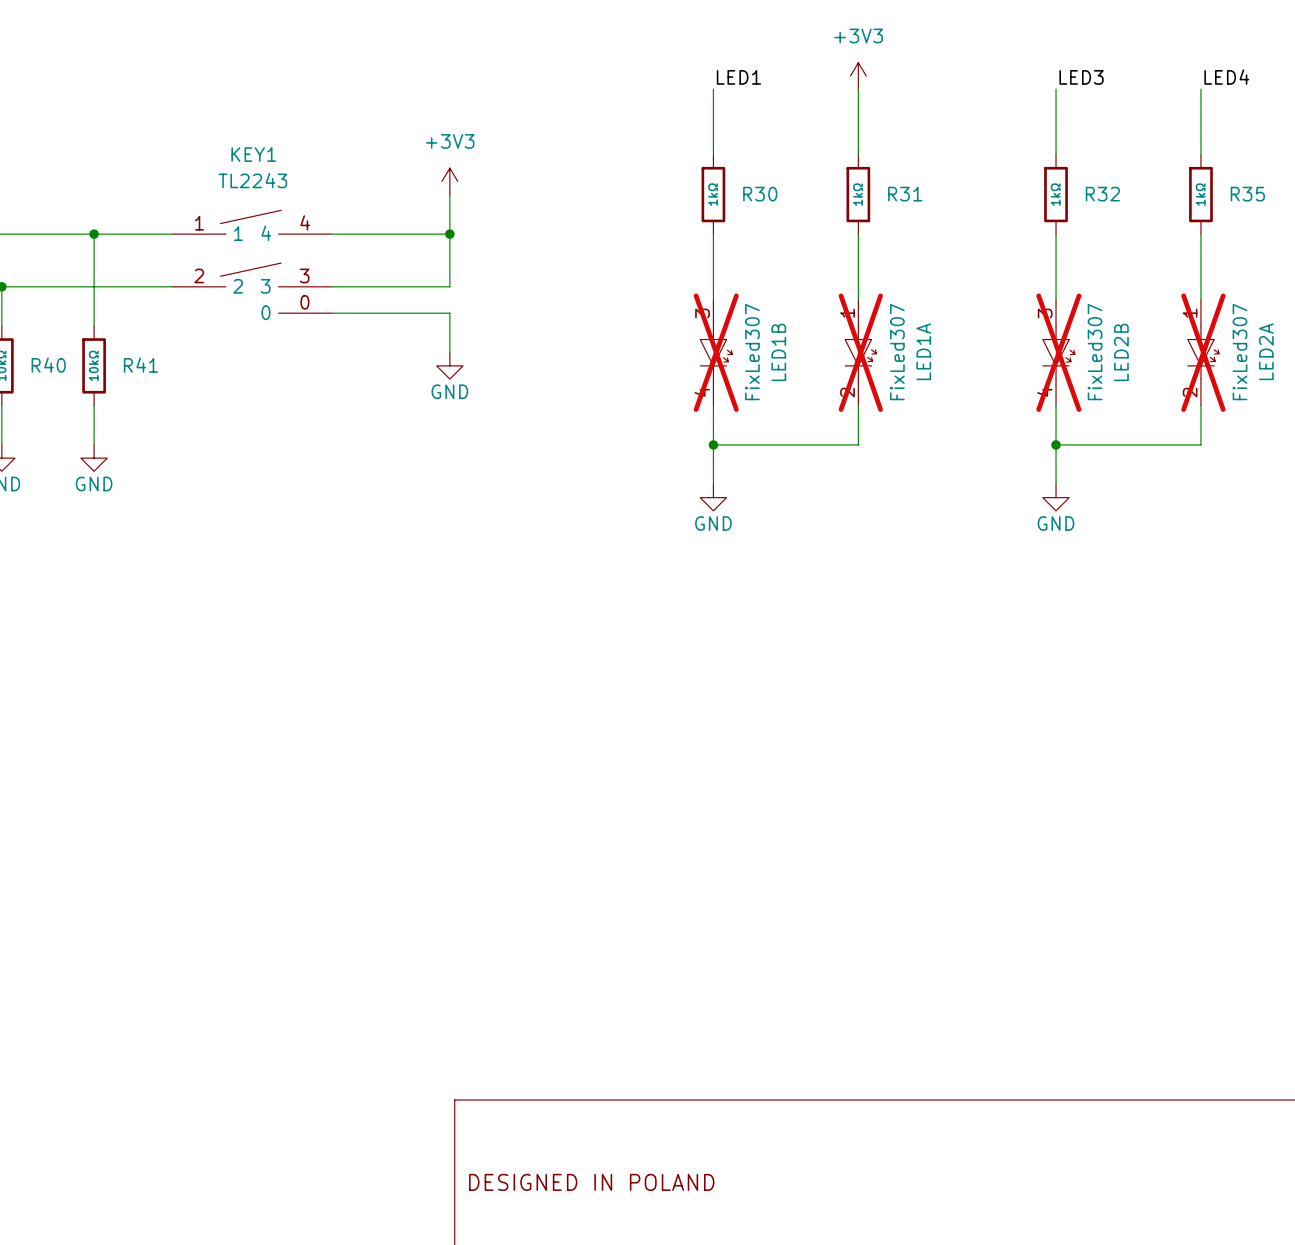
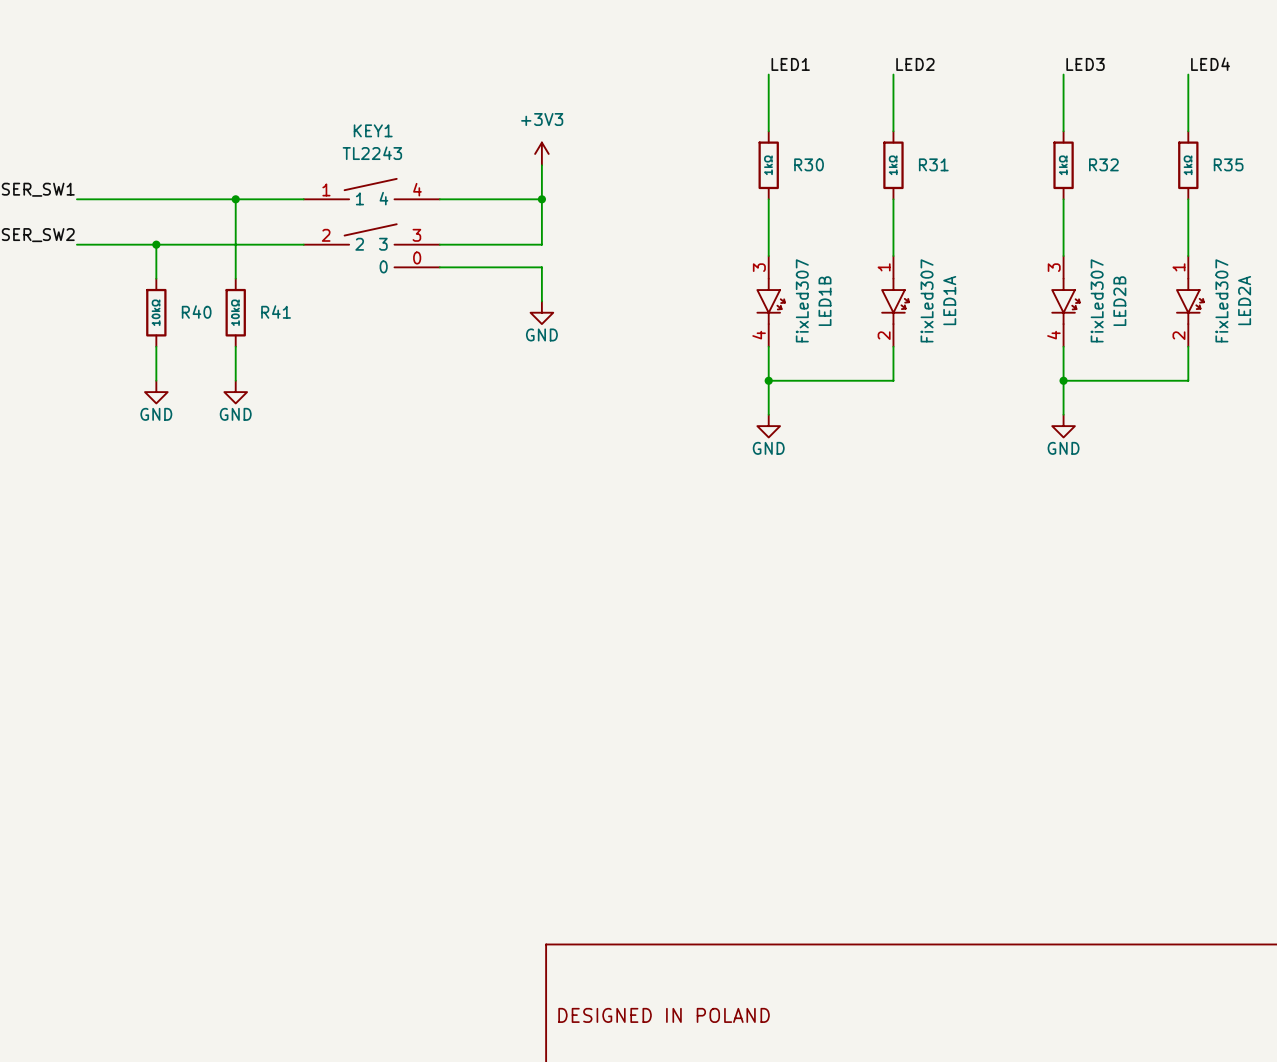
power symbol: +3V3 (858, 75) -> none
label: none -> LED2 (915, 64)
LED1B do-not-place cross: (716, 352) -> none
LED1A do-not-place cross: (860, 352) -> none
LED2B do-not-place cross: (1058, 352) -> none
LED2A do-not-place cross: (1203, 352) -> none

